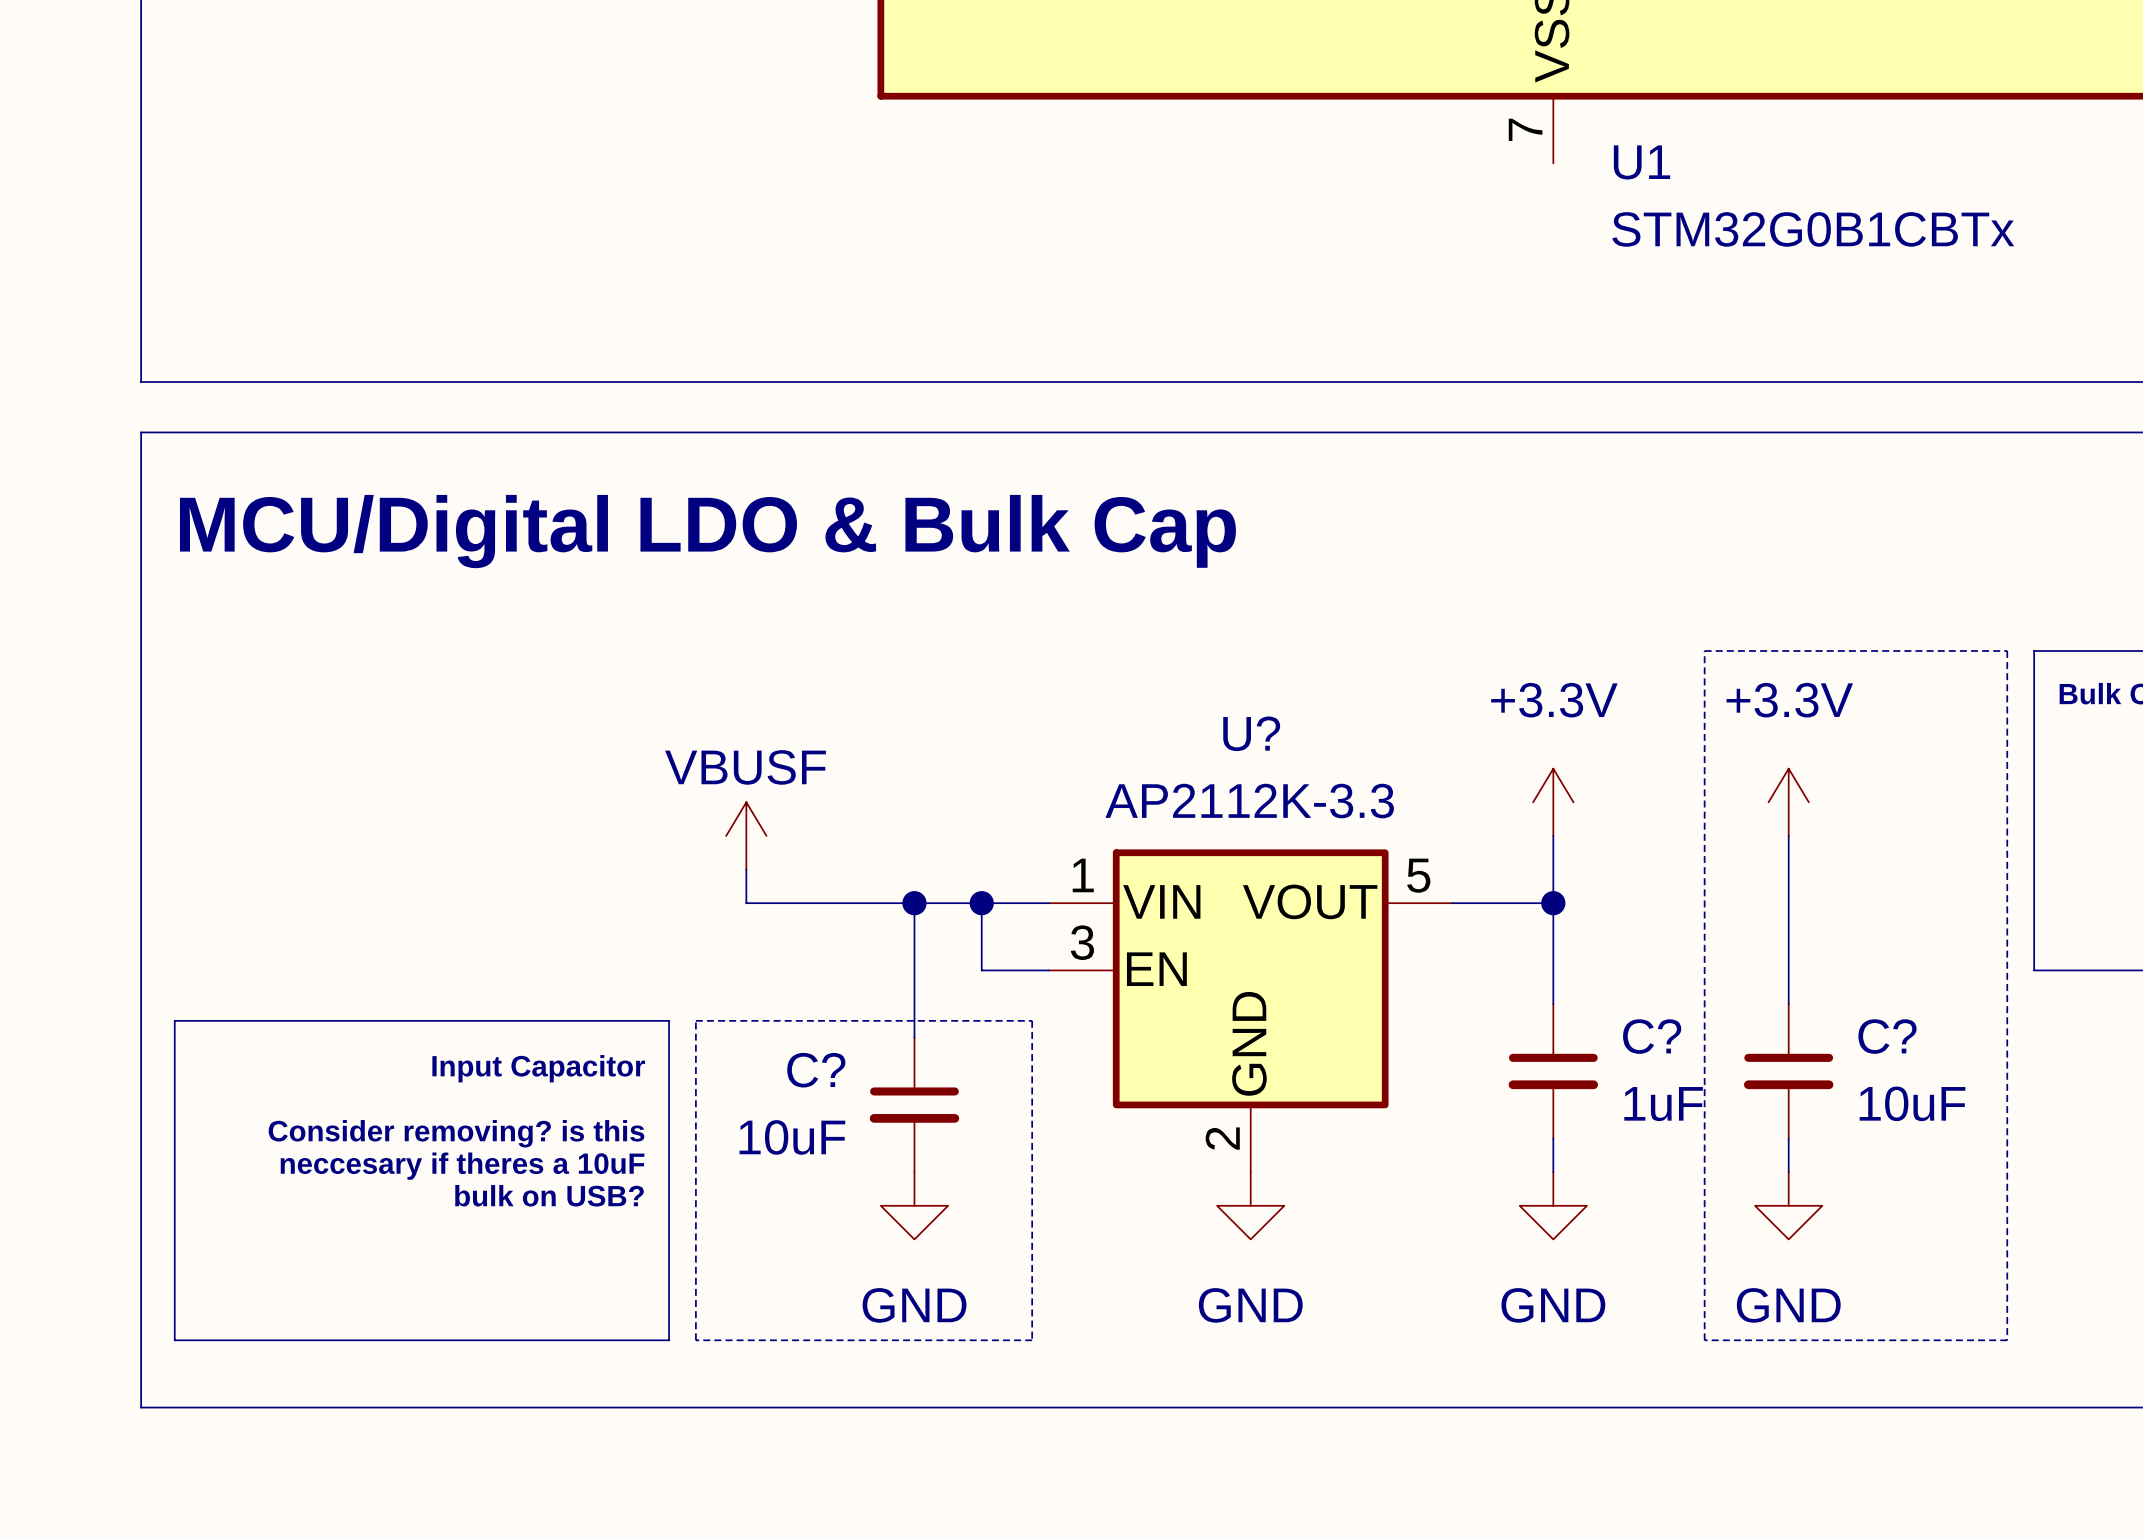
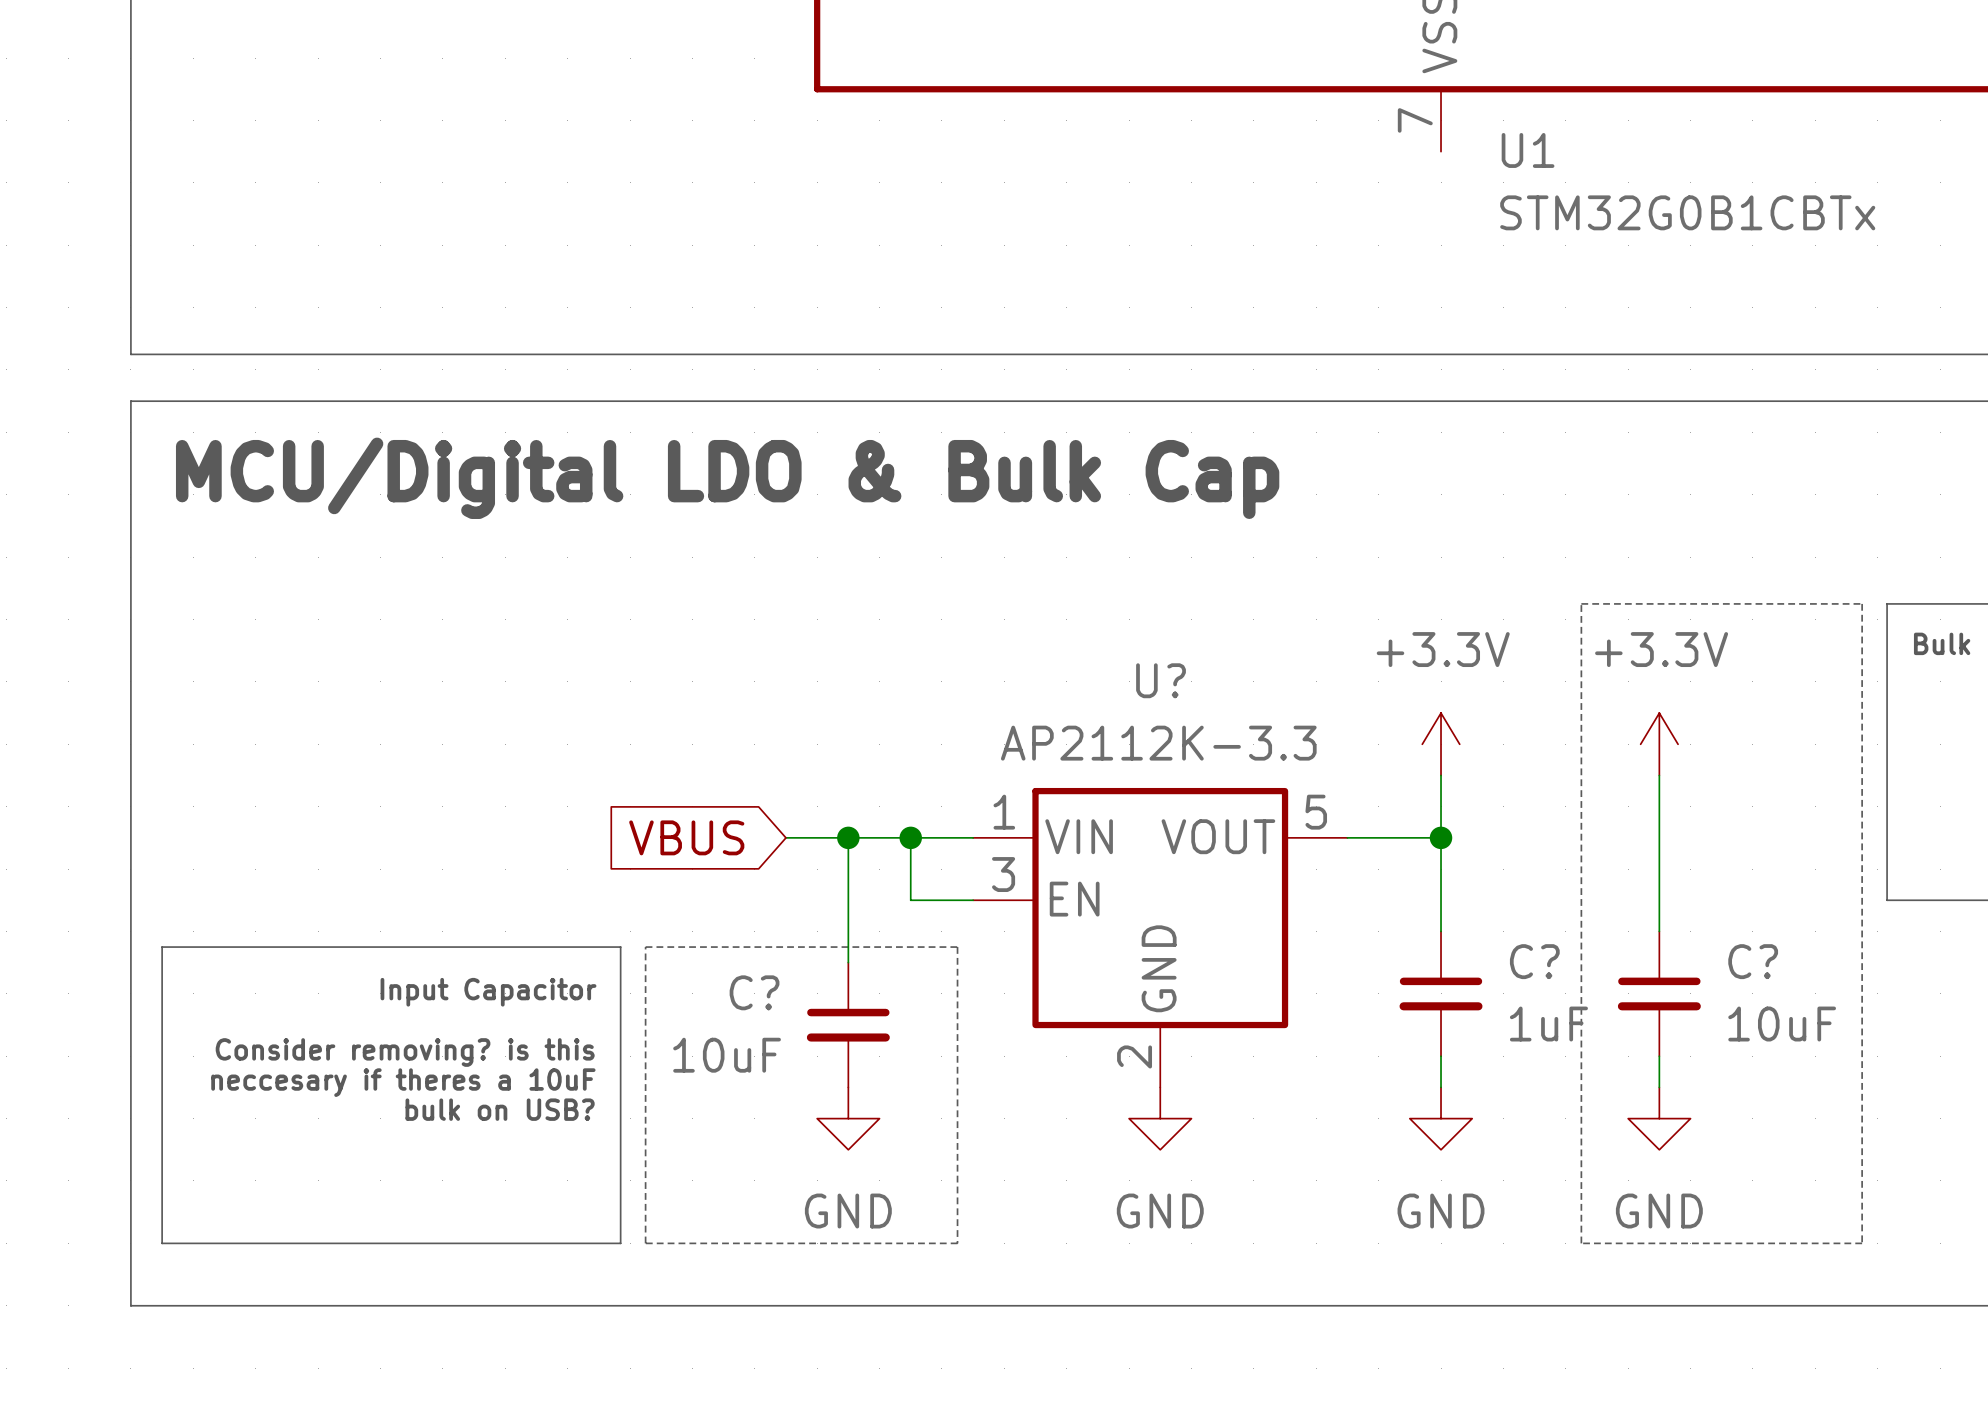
text position: MCU/Digital LDO & Bulk Cap (707, 531) -> MCU/Digital LDO & Bulk Cap (727, 478)
power symbol: VBUSF (746, 835) -> none
wire: (746, 869) (746, 903) (847, 903) -> none
global label: none -> VBUS (686, 837)

